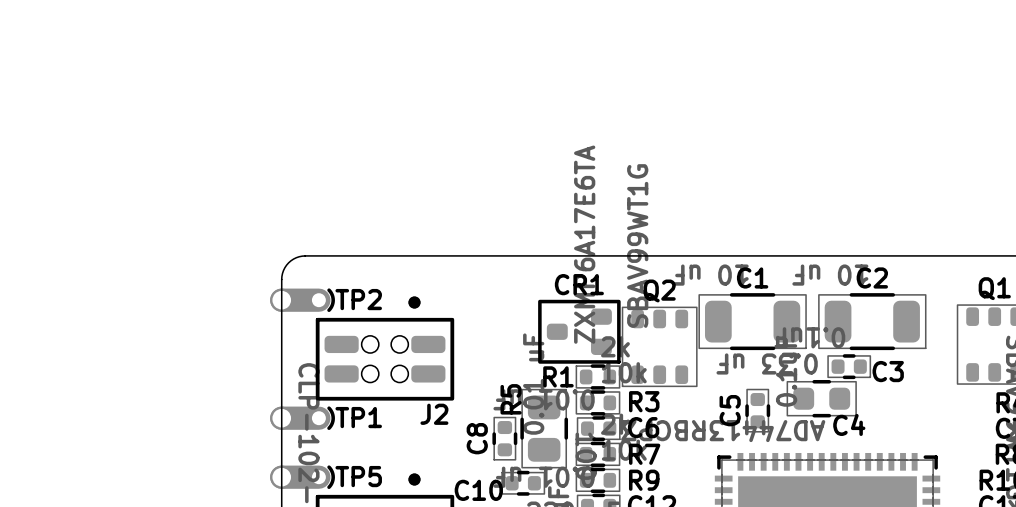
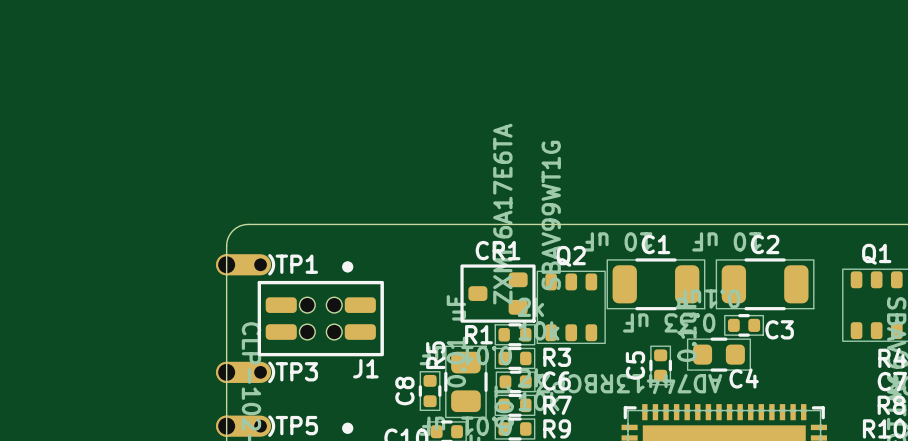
TP2 name: TP2 (358, 299) -> TP1 (296, 264)
J2 name: J2 (434, 414) -> J1 (365, 368)
TP1 name: TP1 (358, 417) -> TP3 (296, 371)

